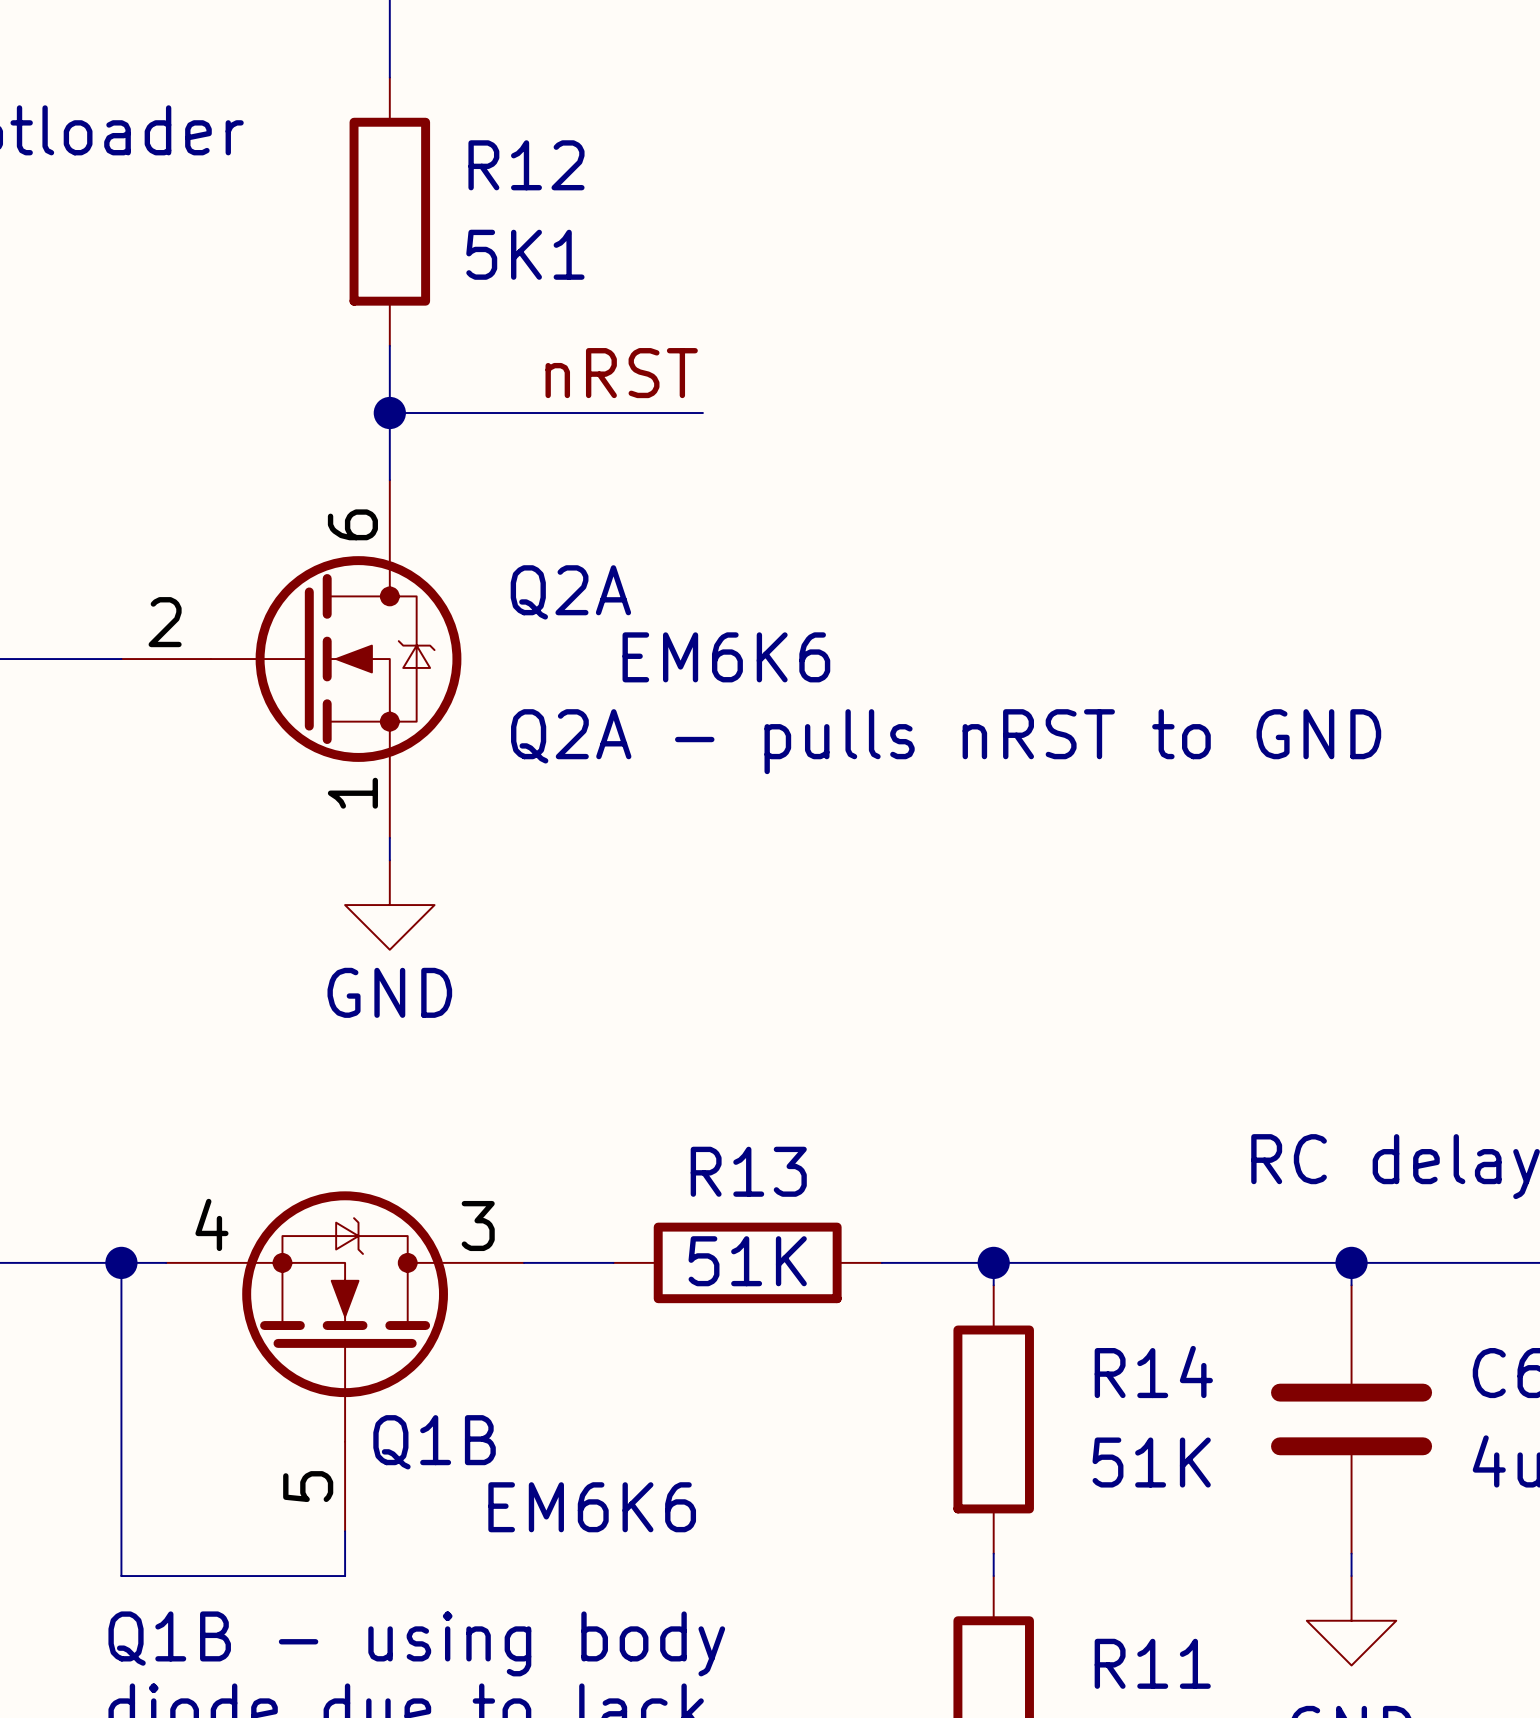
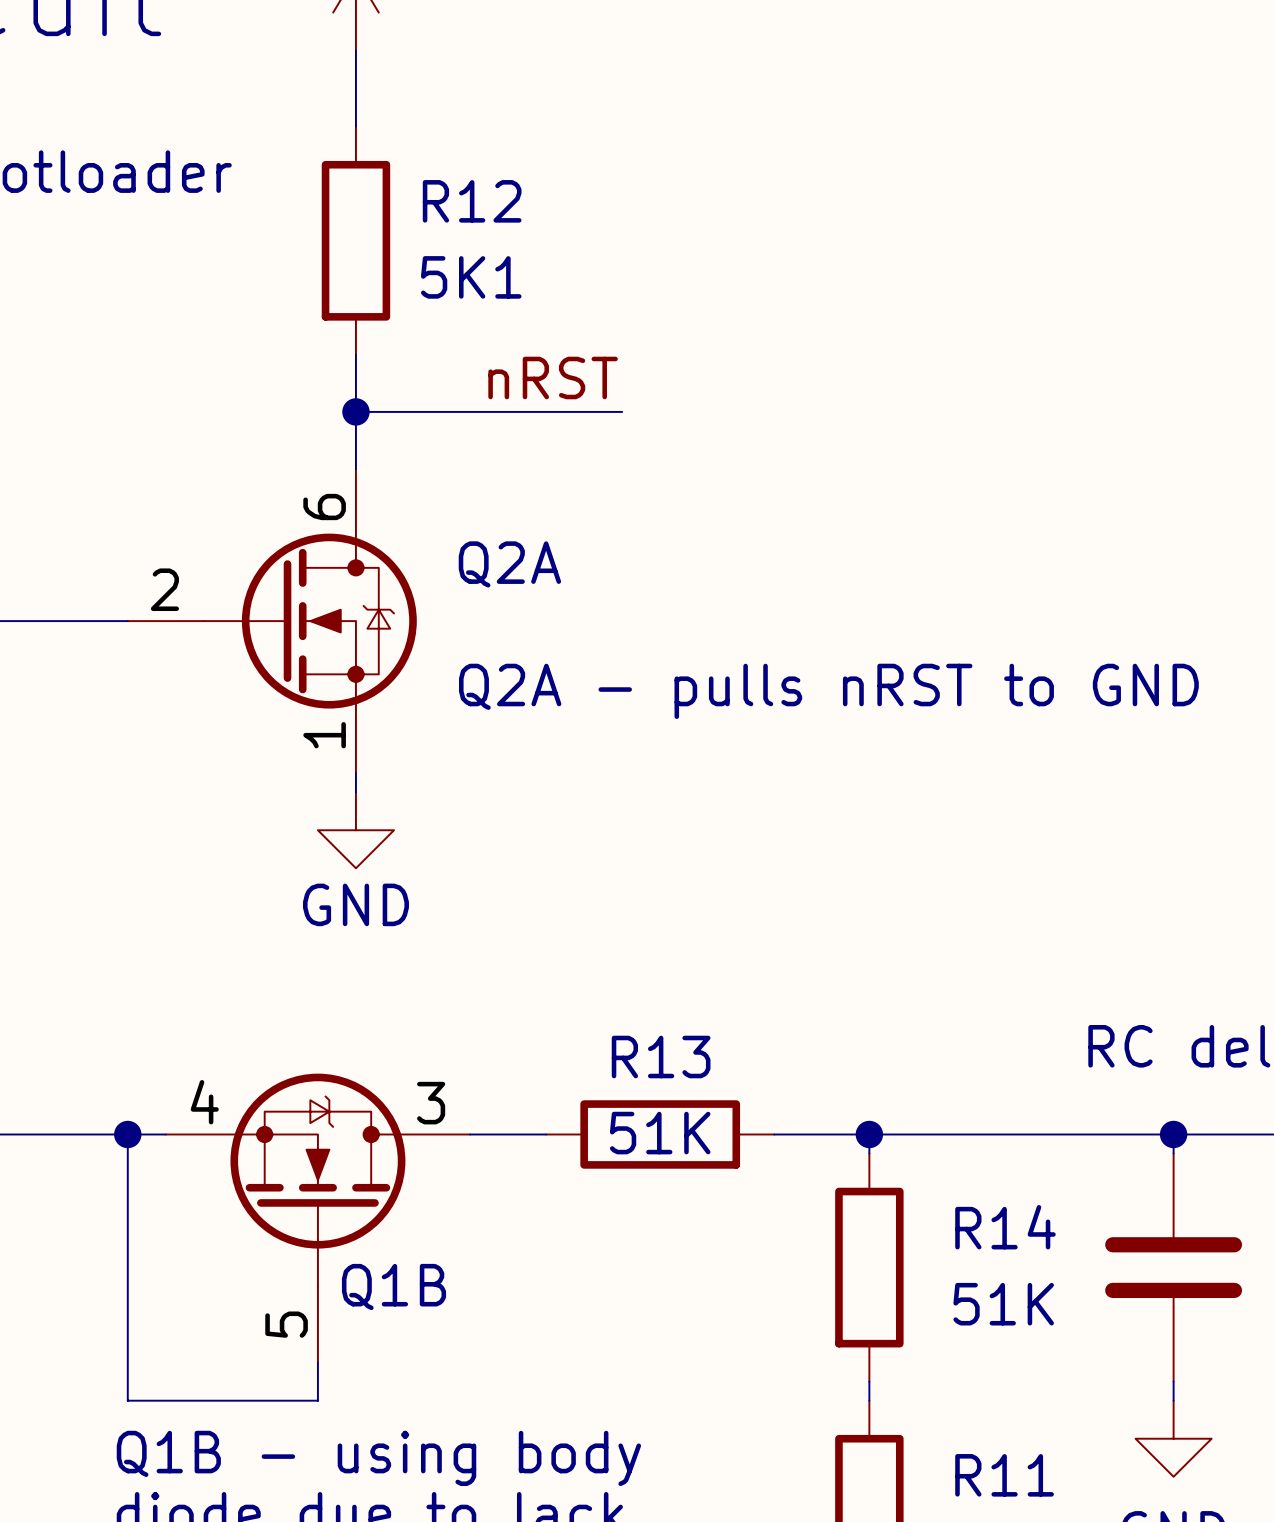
Q2A value: EM6K6 (726, 657) -> none
Q1B value: EM6K6 (592, 1507) -> none

